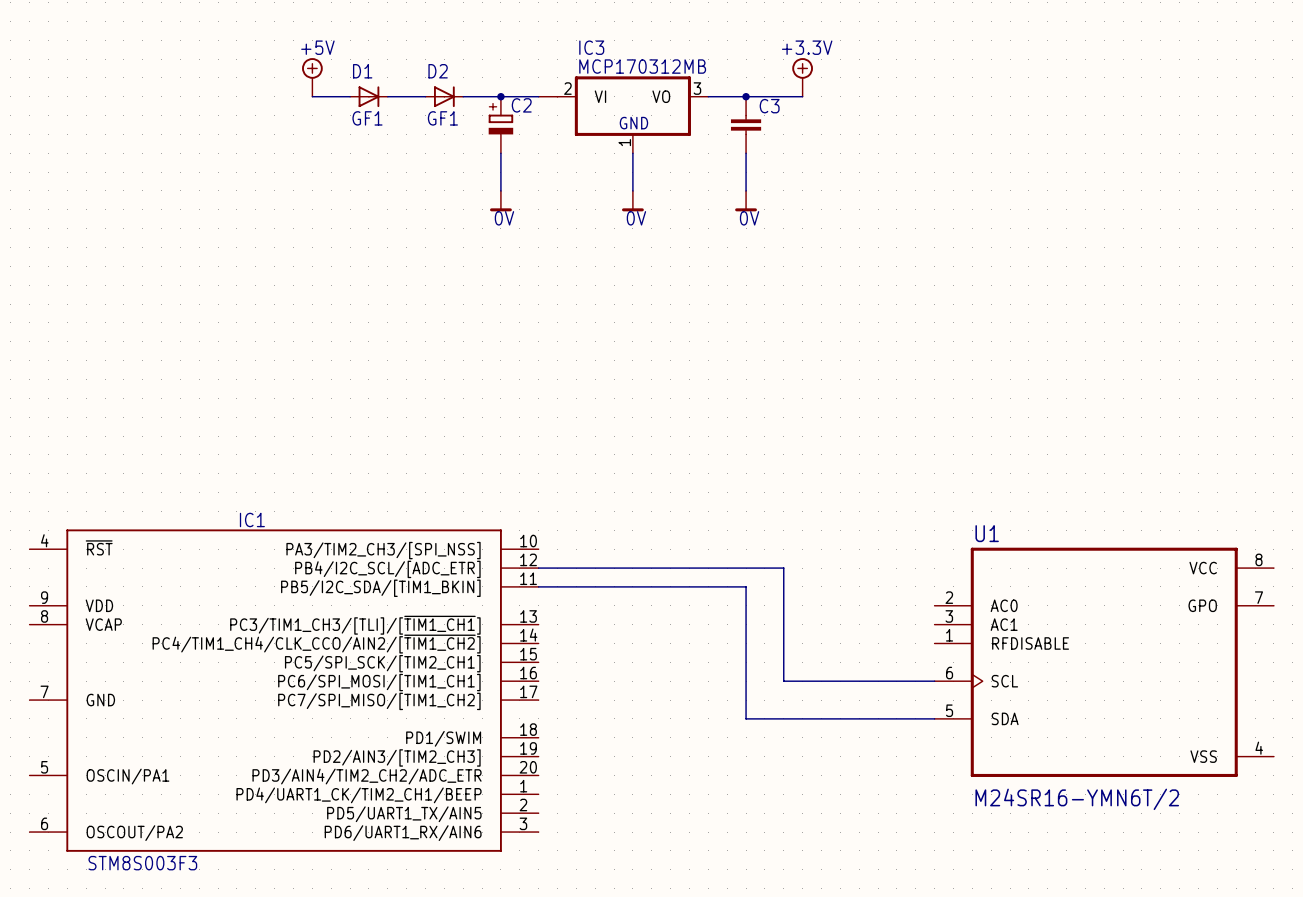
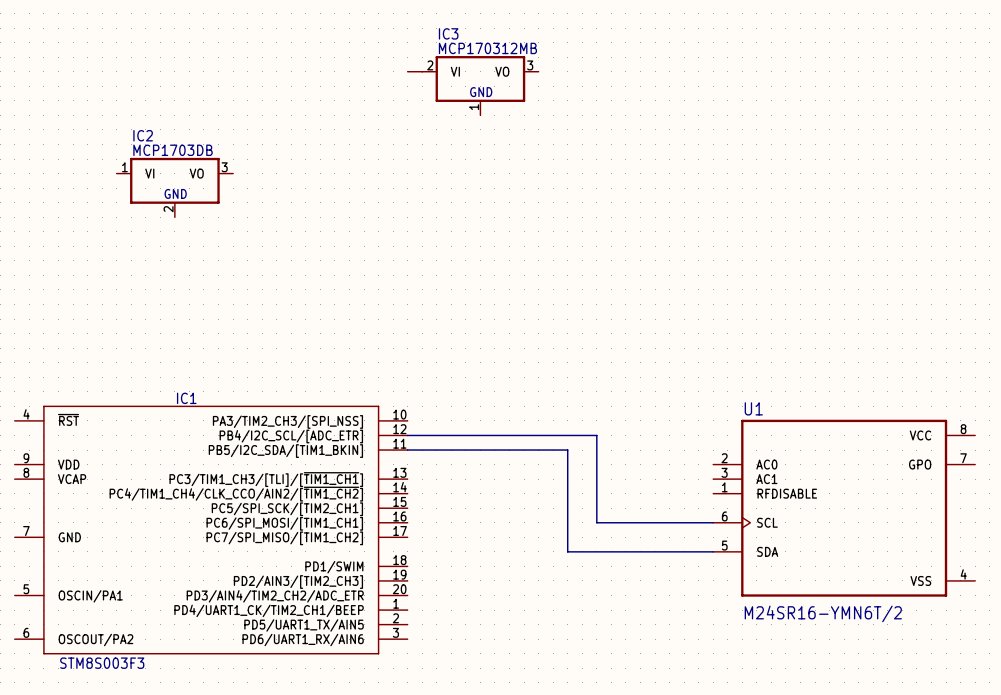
power symbol: +5V (312, 77) -> none
power symbol: +3.3V (802, 77) -> none
wire: (312, 96) (350, 96) -> none
D1: GF1 (368, 96) -> none
wire: (387, 96) (425, 96) -> none
D2: GF1 (444, 96) -> none
wire: (463, 96) (538, 96) -> none
junction: (500, 96) -> none
wire: (708, 96) (802, 96) -> none
junction: (746, 96) -> none
C2: (500, 124) -> none
C3: (746, 124) -> none
wire: (500, 153) (500, 190) -> none
wire: (632, 153) (632, 190) -> none
wire: (746, 153) (746, 190) -> none
power symbol: 0V (500, 201) -> none
power symbol: 0V (632, 201) -> none
power symbol: 0V (746, 201) -> none
IC2: none -> MCP1703DB (174, 187)

